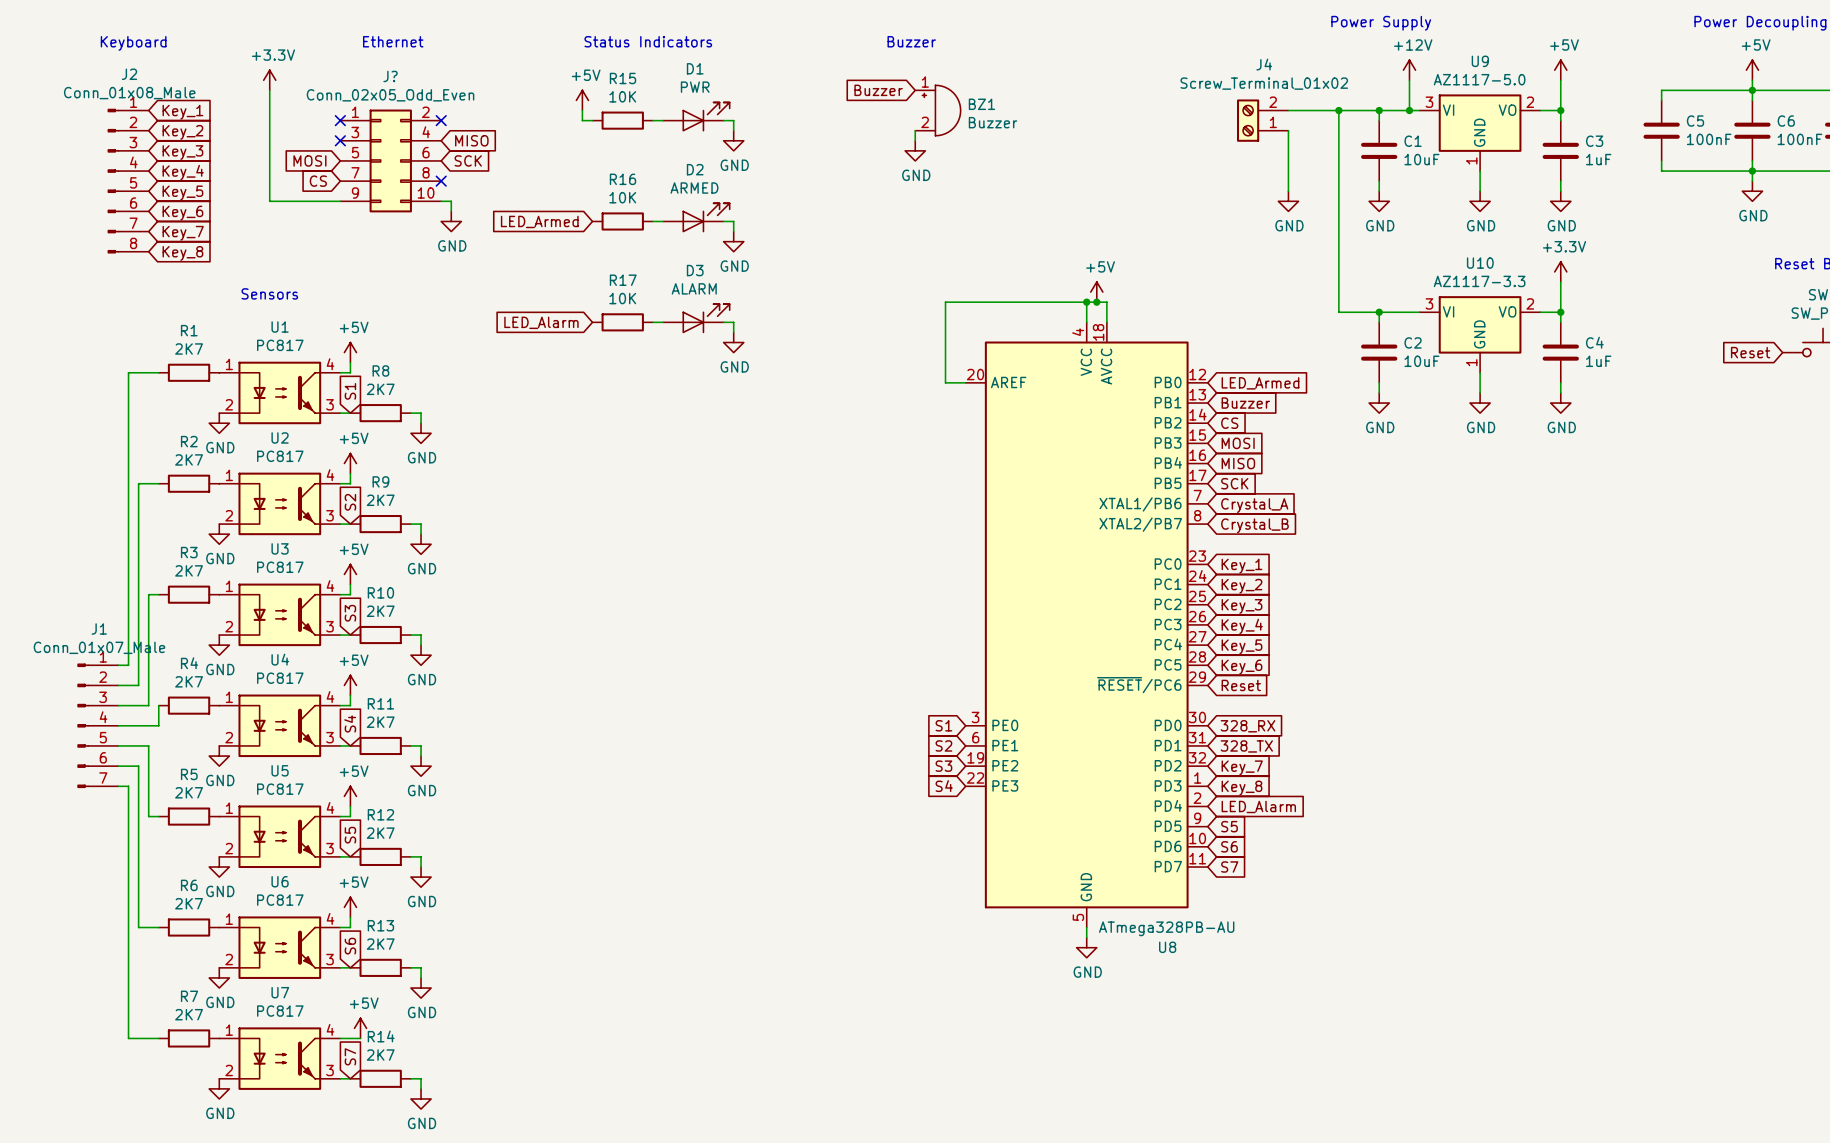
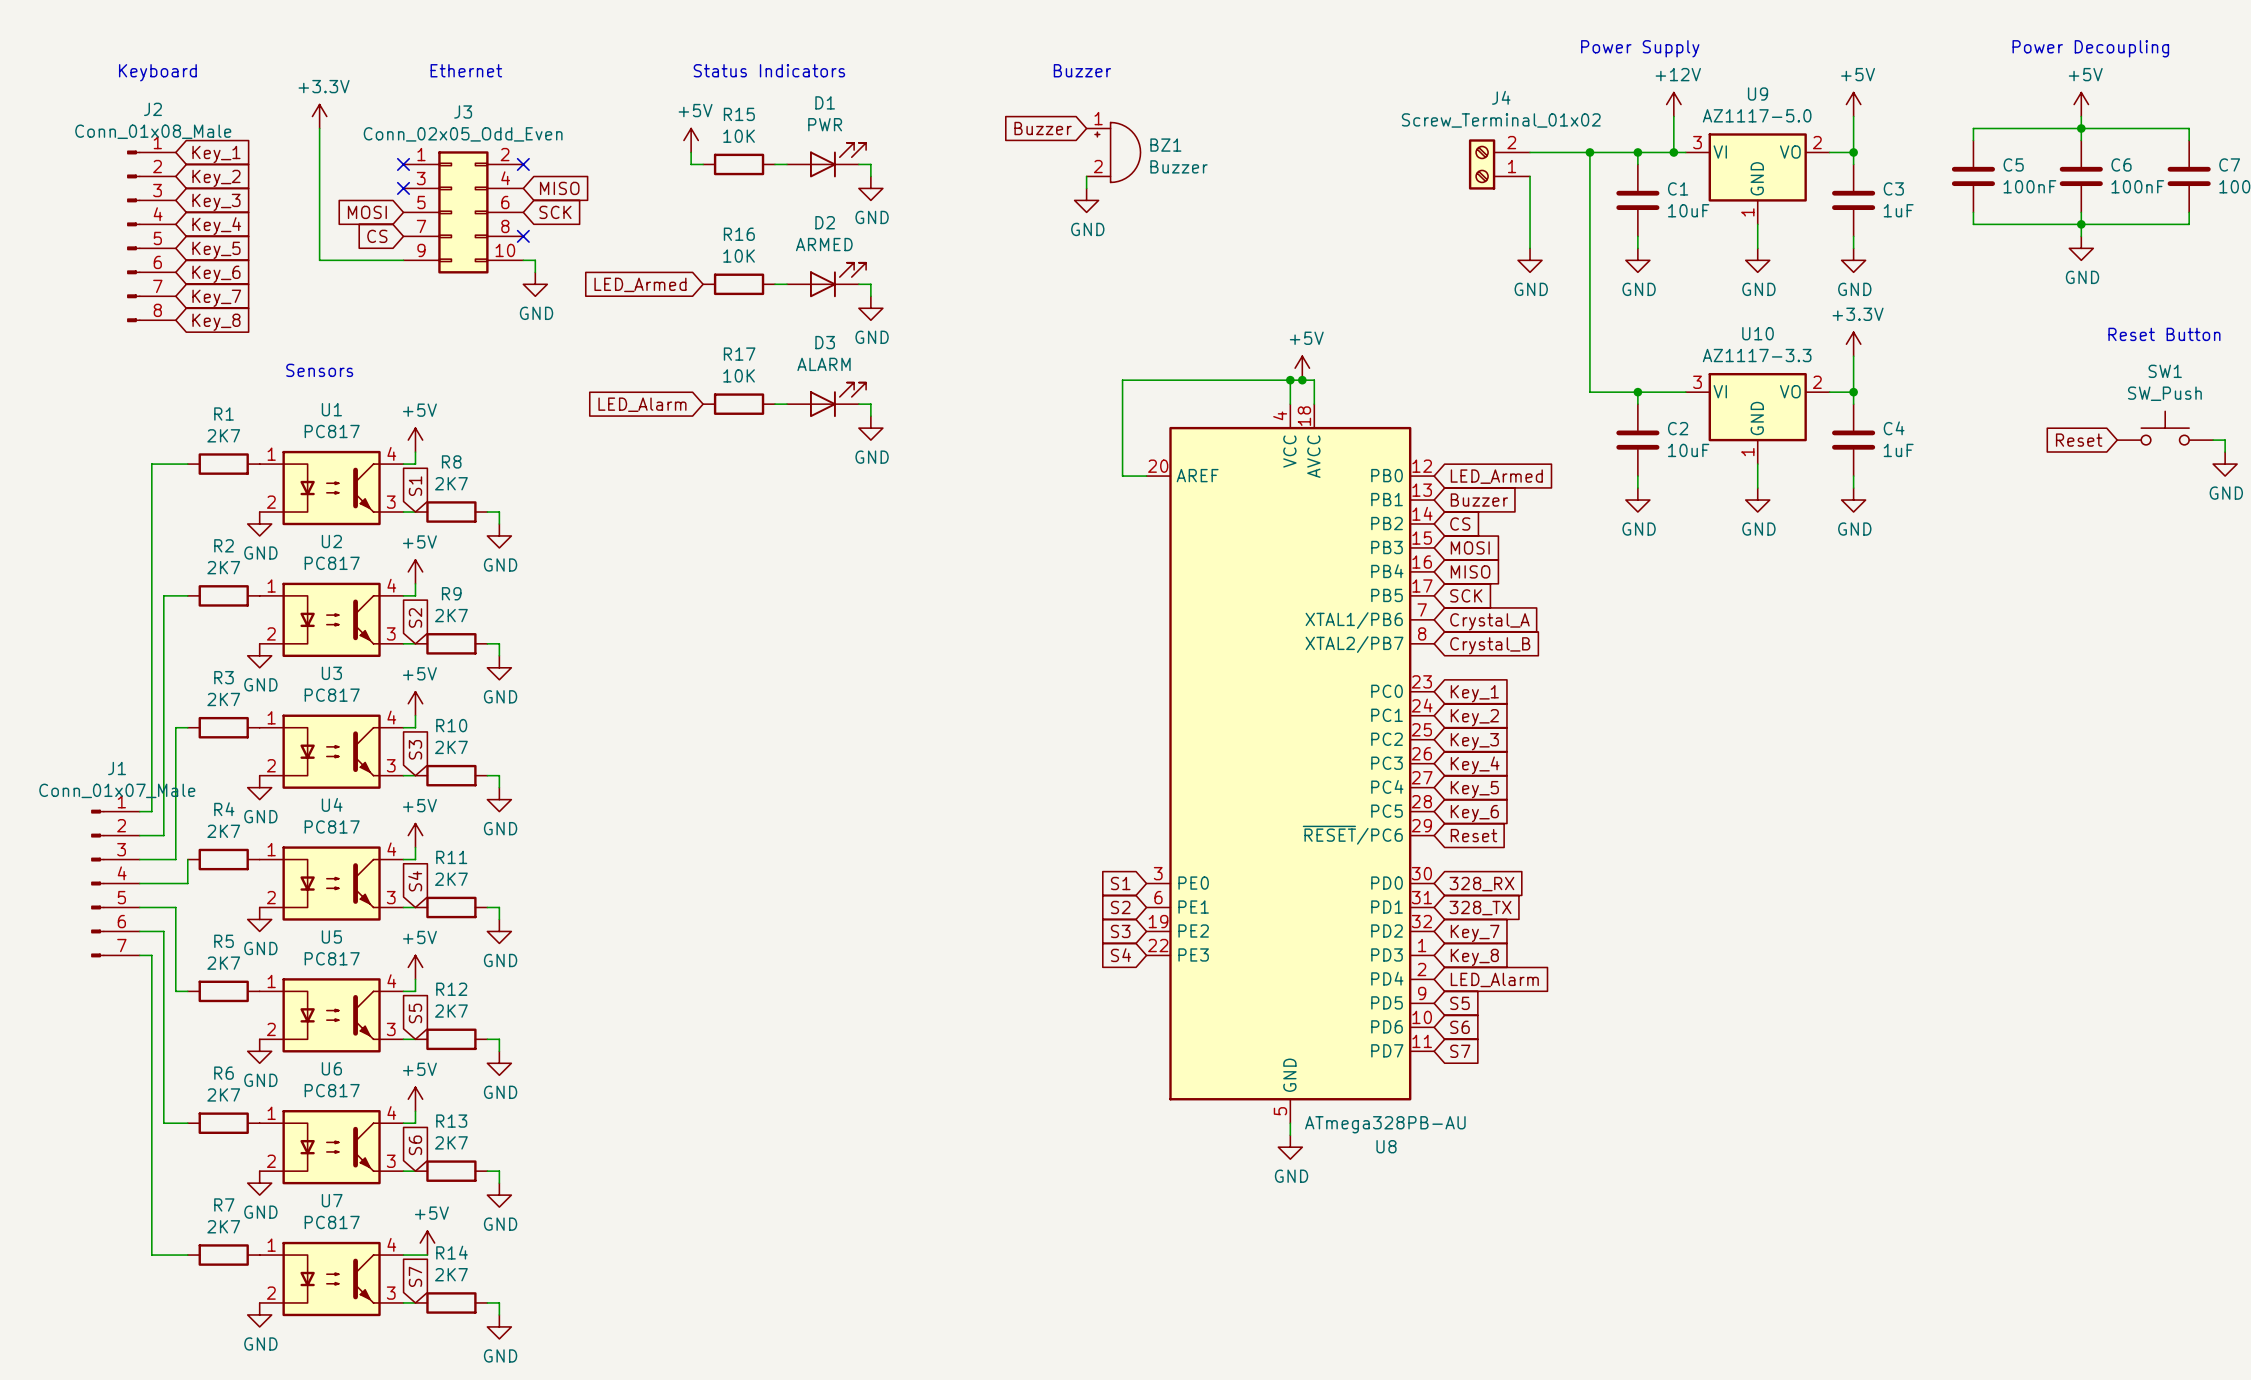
J? name: J? (390, 76) -> J3 (463, 112)

